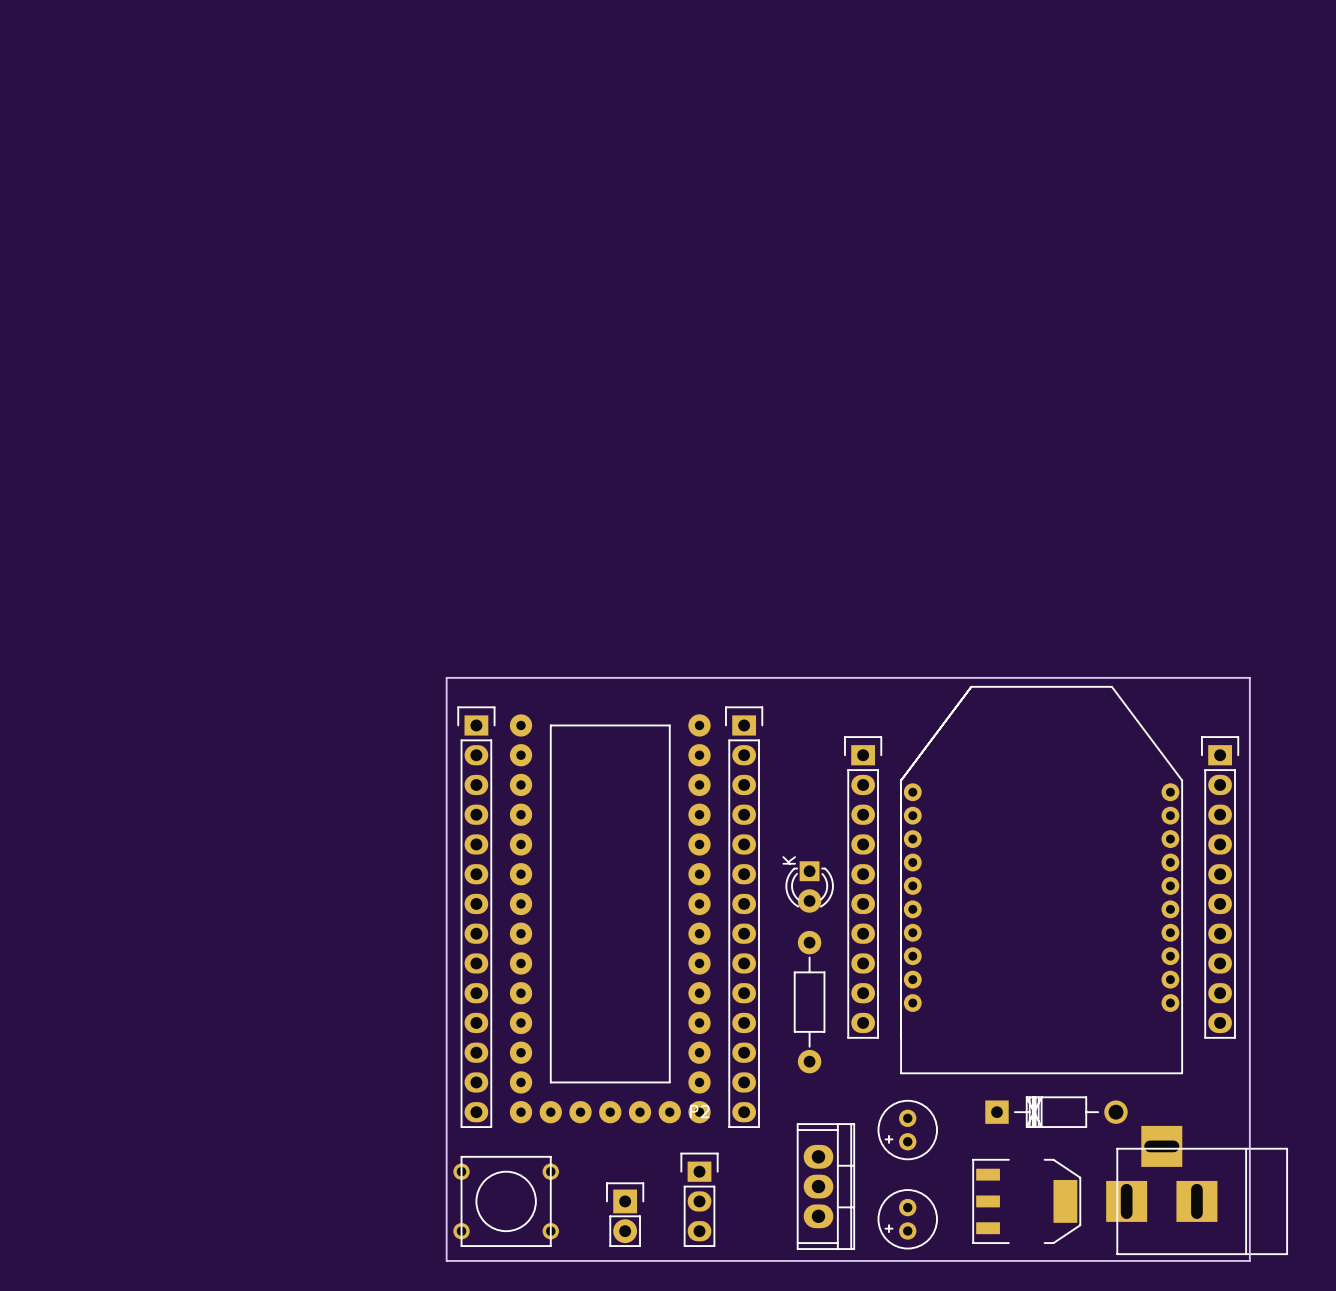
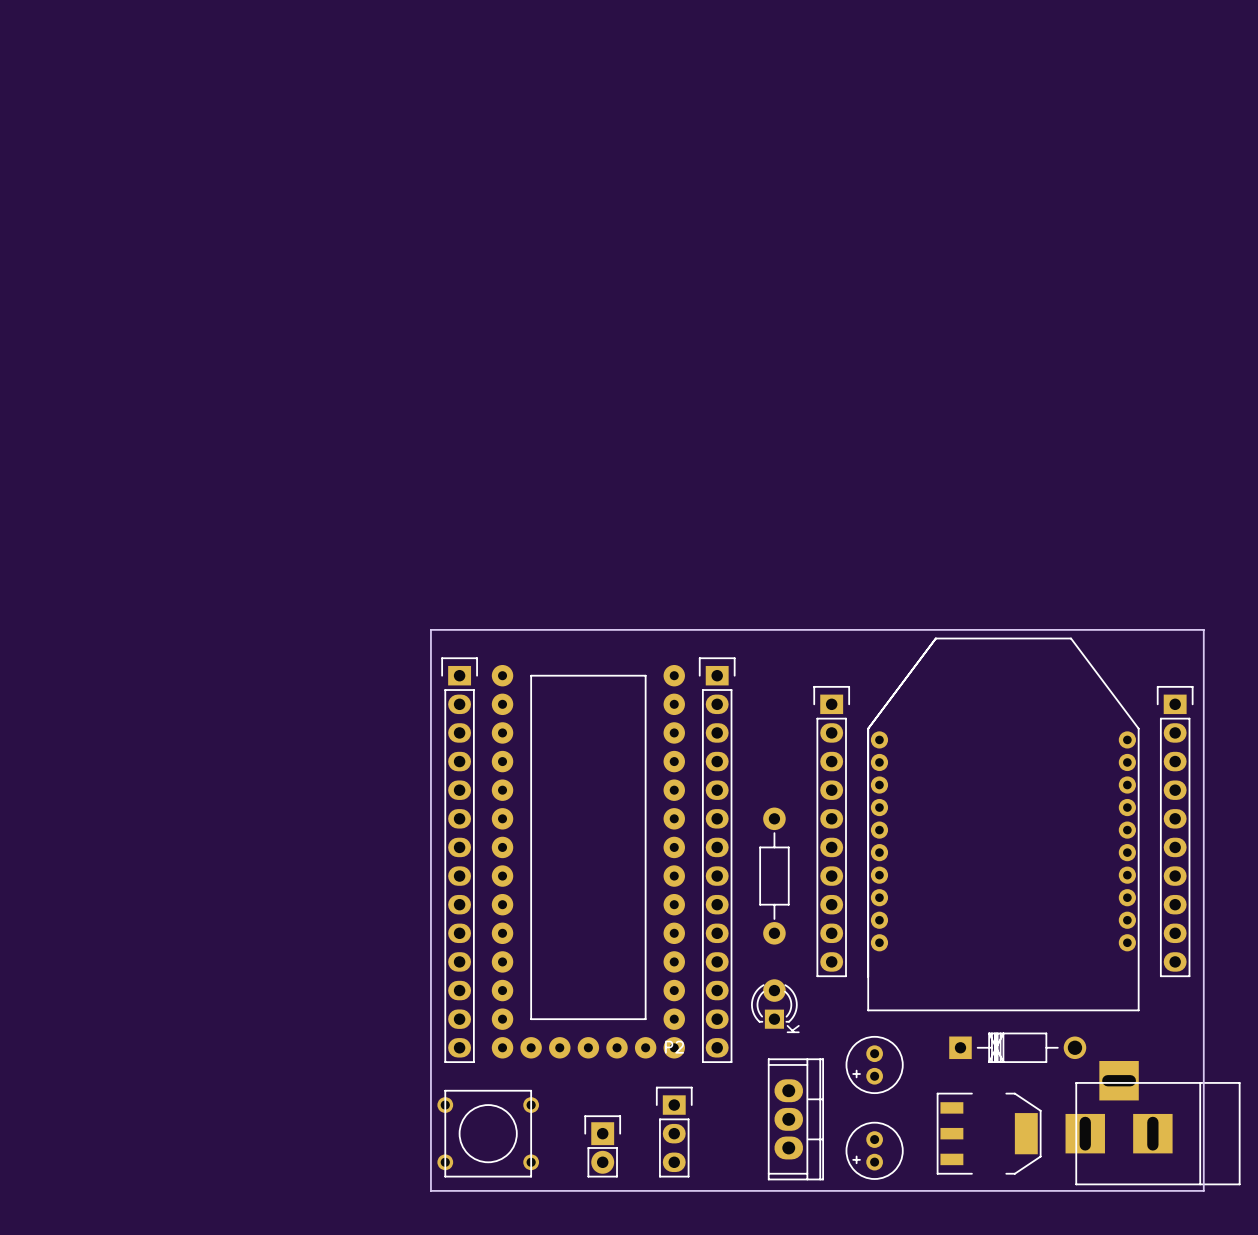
part rotation: 0° (809, 886) -> 180° (774, 1004)
part position: (809, 886) -> (774, 1004)
part position: (809, 1002) -> (774, 876)

